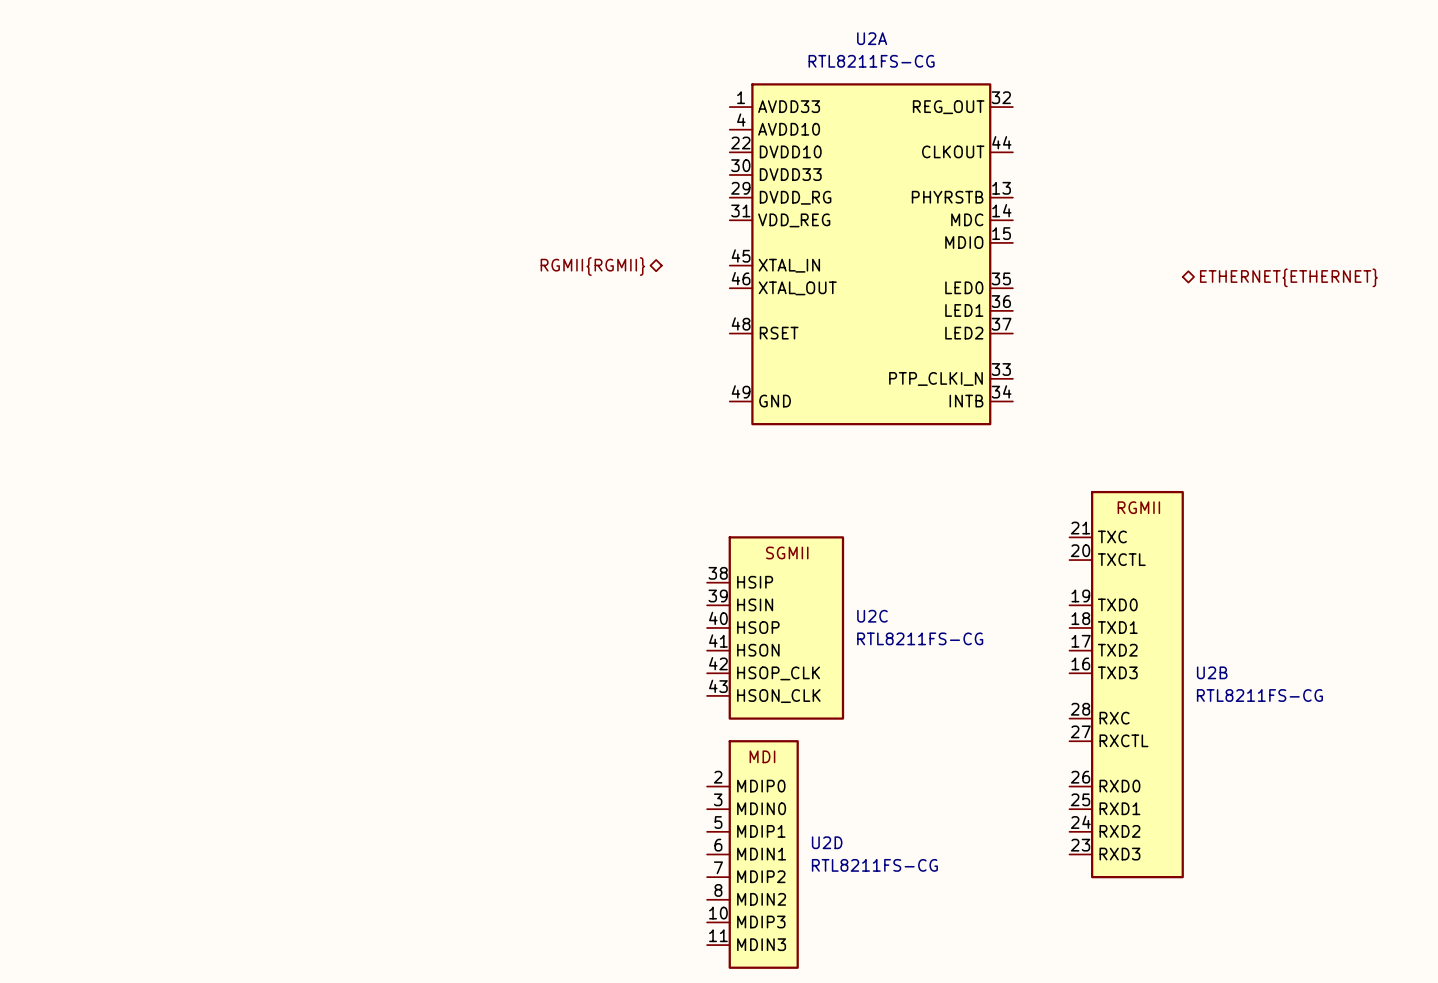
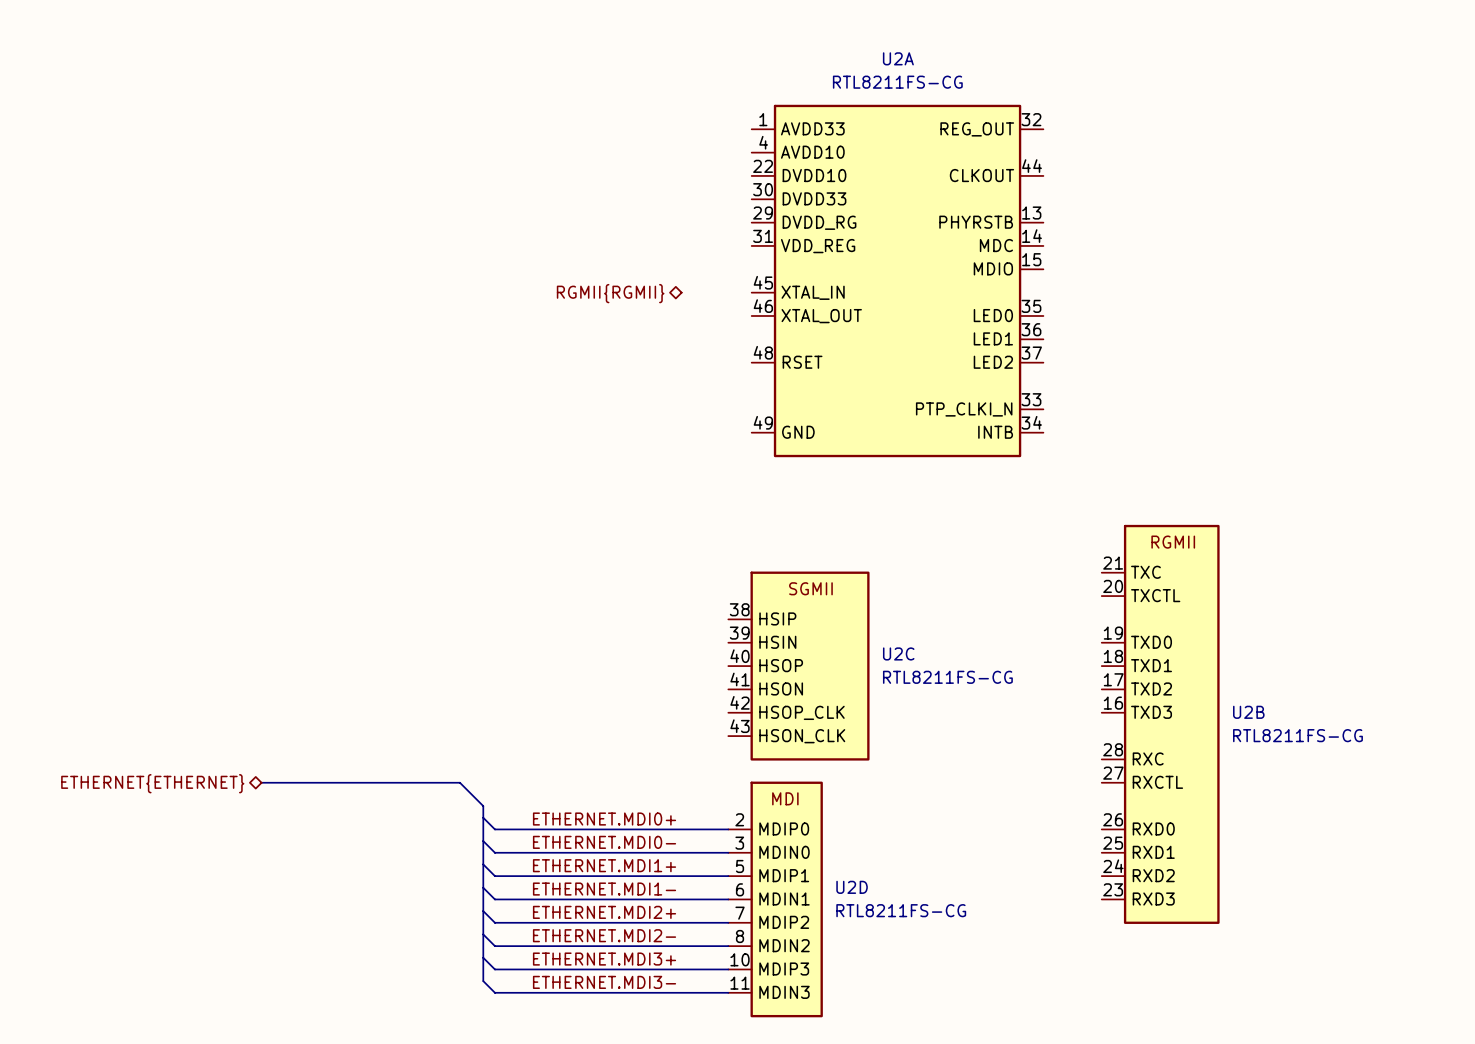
hierarchical label: ETHERNET{ETHERNET} (1288, 277) -> none
bus: none -> (261, 782) (459, 782) (483, 806) (483, 981)
hierarchical label: none -> ETHERNET{ETHERNET} (152, 783)
wire: none -> (483, 817) (494, 829) (728, 829)
label: none -> ETHERNET.MDI0+ (604, 819)
wire: none -> (483, 841) (494, 852) (728, 852)
label: none -> ETHERNET.MDI0- (604, 842)
wire: none -> (483, 864) (494, 876) (728, 876)
label: none -> ETHERNET.MDI1+ (604, 865)
wire: none -> (483, 887) (494, 899) (728, 899)
label: none -> ETHERNET.MDI1- (604, 889)
wire: none -> (483, 911) (494, 922) (728, 922)
label: none -> ETHERNET.MDI2+ (604, 912)
wire: none -> (483, 934) (494, 946) (728, 946)
label: none -> ETHERNET.MDI2- (604, 935)
wire: none -> (483, 957) (494, 969) (728, 969)
label: none -> ETHERNET.MDI3+ (604, 959)
wire: none -> (483, 981) (494, 992) (728, 992)
label: none -> ETHERNET.MDI3- (604, 982)

